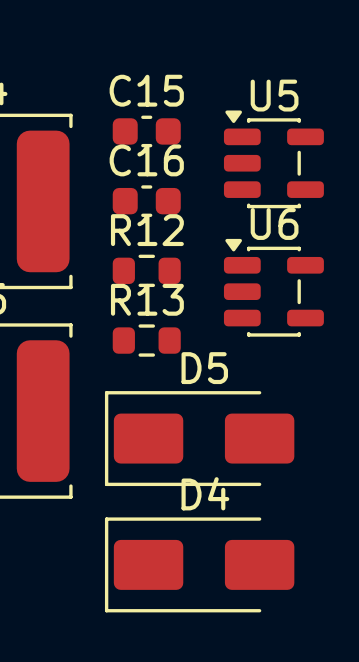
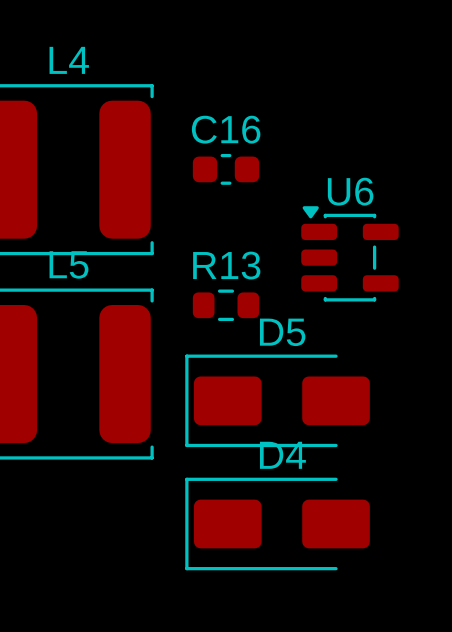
C15: (146, 131) -> none
U5: (273, 159) -> none
R12: (146, 270) -> none

